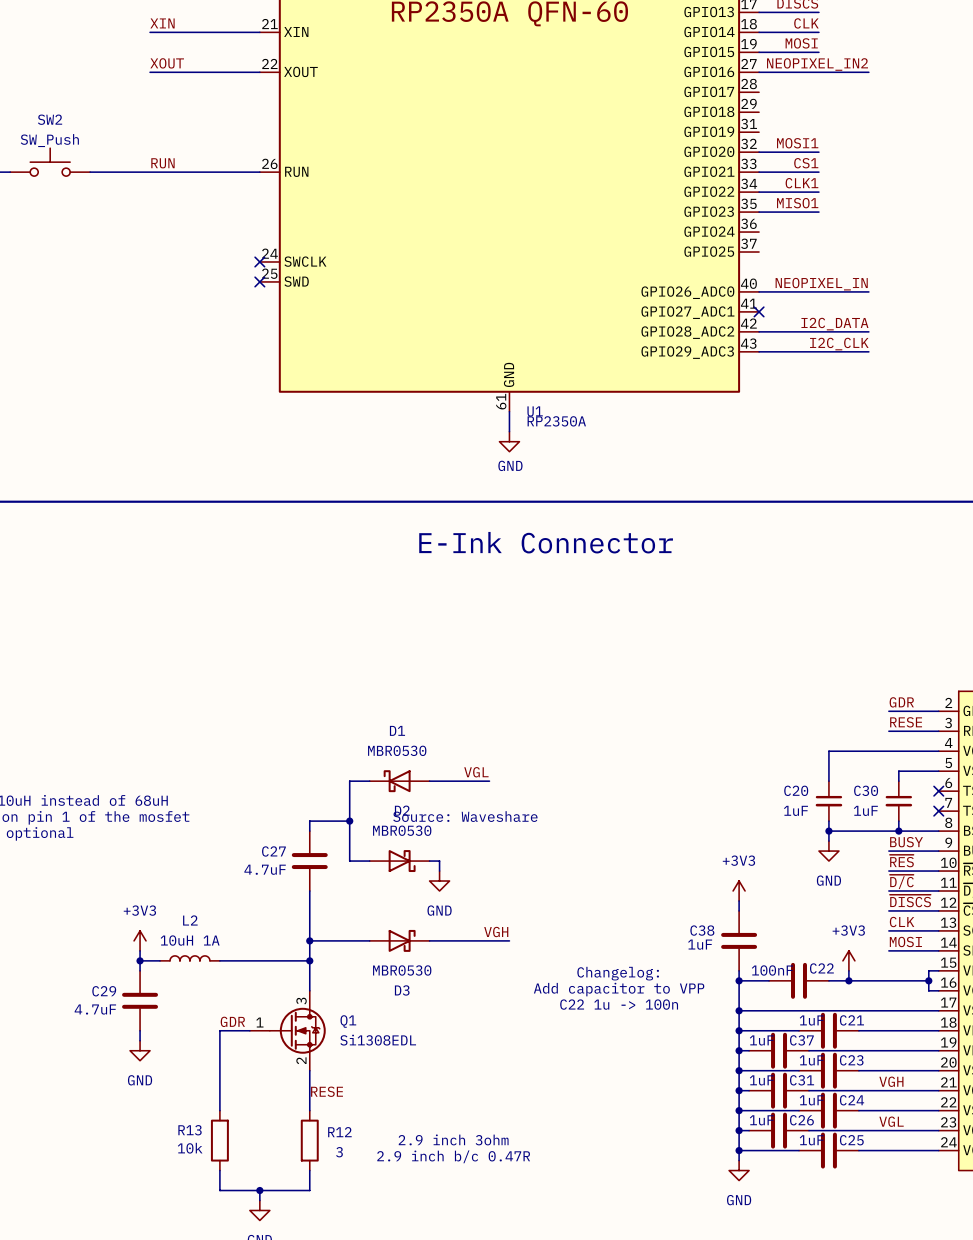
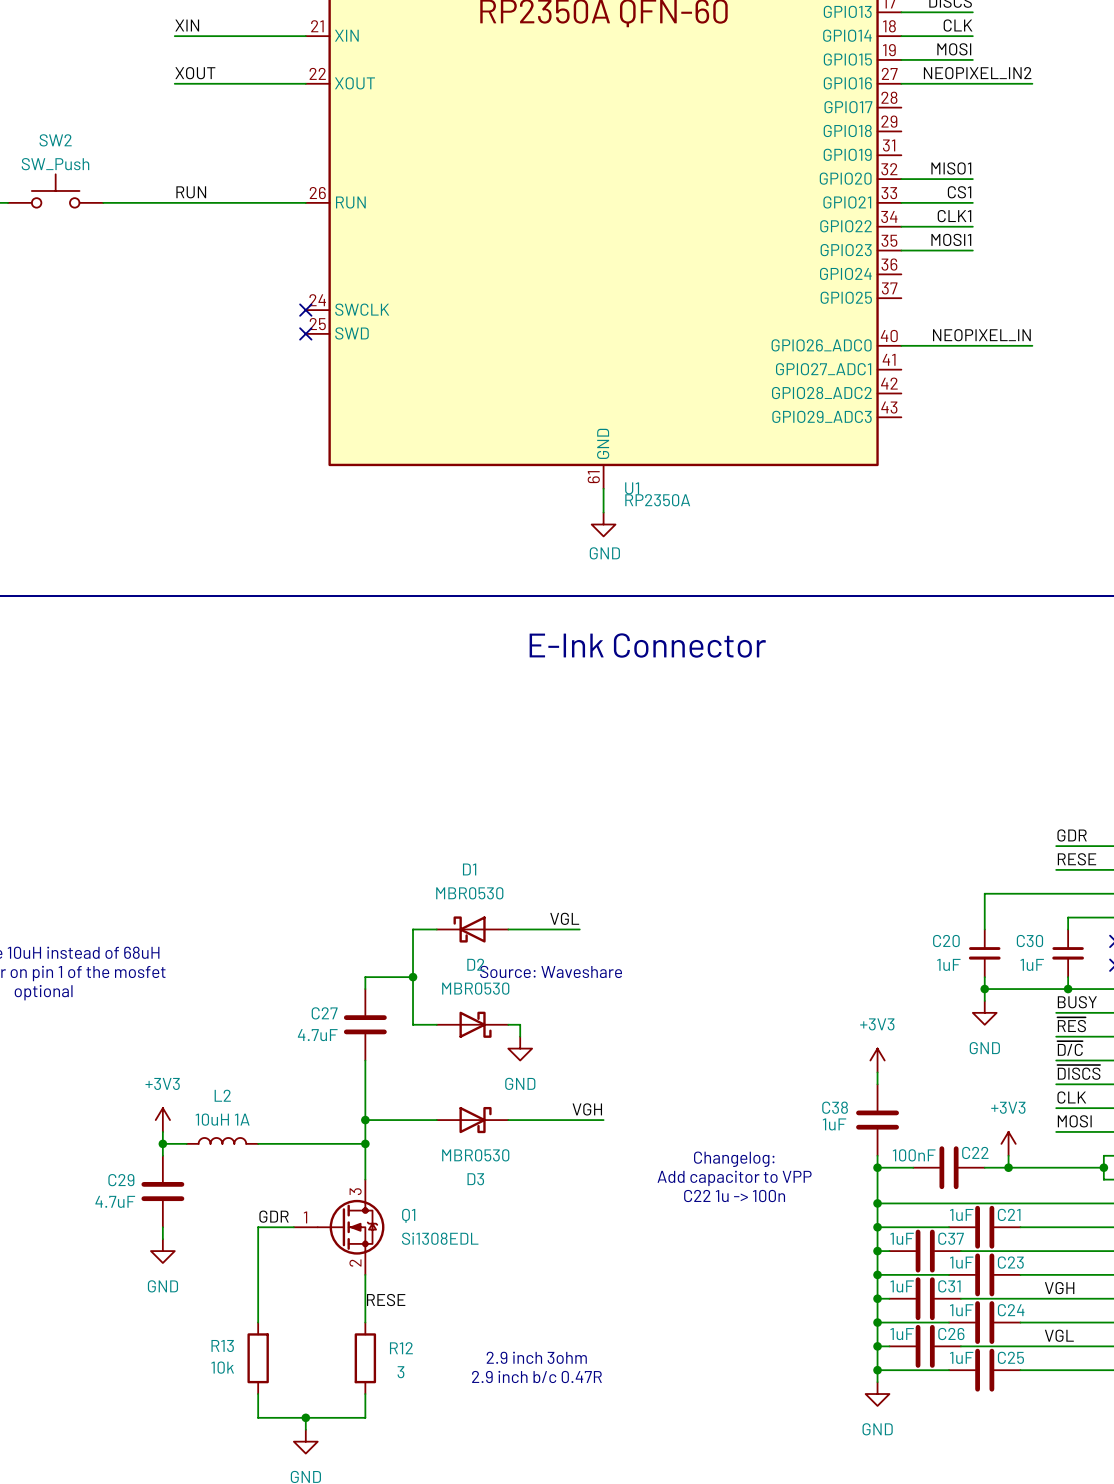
label: MOSI1 (797, 143) -> MISO1 (951, 168)
label: MISO1 (797, 203) -> MOSI1 (951, 239)
no-connect mark: (759, 311) -> none
label: I2C_DATA (834, 324) -> none
wire: (759, 331) (868, 331) -> none
label: I2C_CLK (839, 344) -> none
wire: (759, 351) (868, 351) -> none

